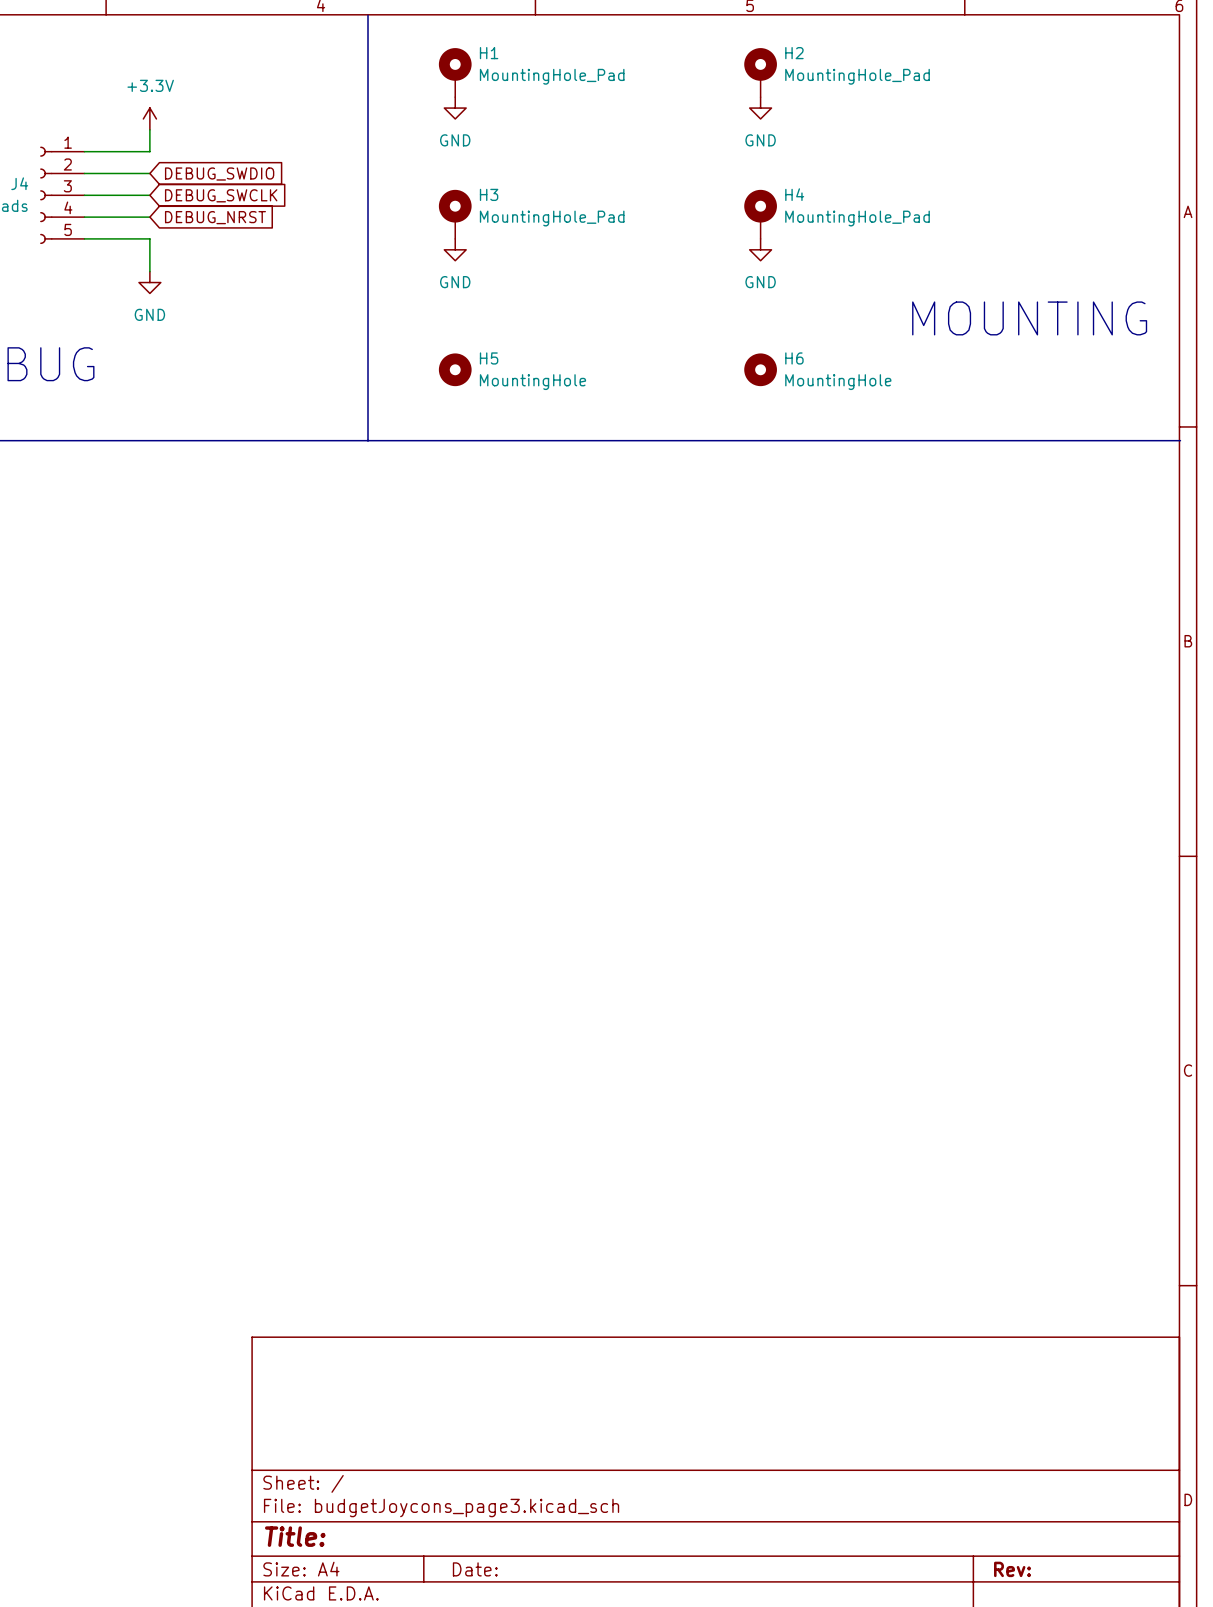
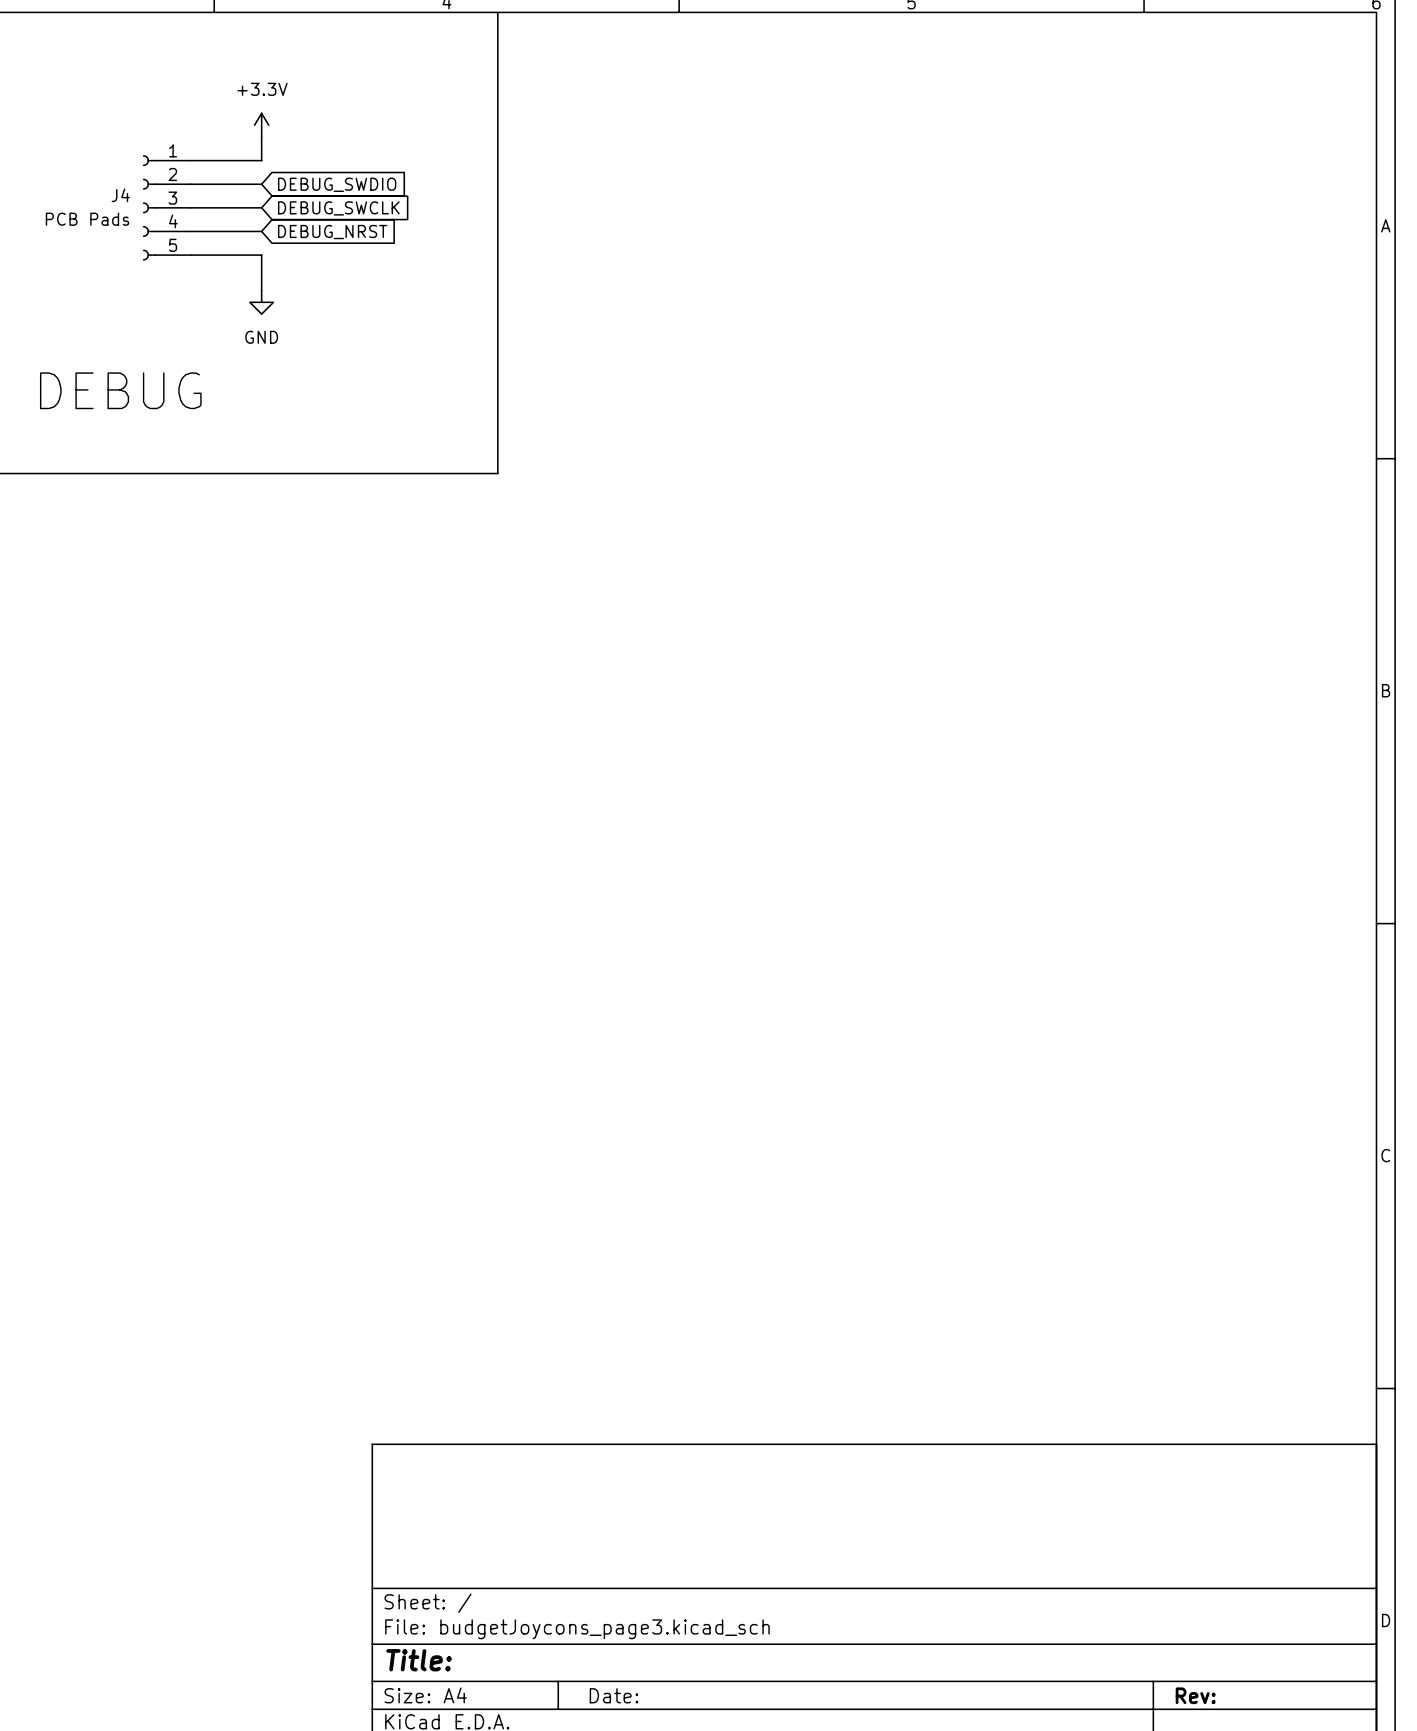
H1: MountingHole_Pad (455, 72) -> none
H2: MountingHole_Pad (760, 72) -> none
power symbol: GND (455, 108) -> none
power symbol: GND (760, 108) -> none
H3: MountingHole_Pad (455, 214) -> none
H4: MountingHole_Pad (760, 214) -> none
power symbol: GND (455, 249) -> none
power symbol: GND (760, 249) -> none
text: MOUNTING (1029, 318) -> none
H5: MountingHole (455, 369) -> none
H6: MountingHole (760, 369) -> none
line: (368, 440) (1180, 440) -> none

